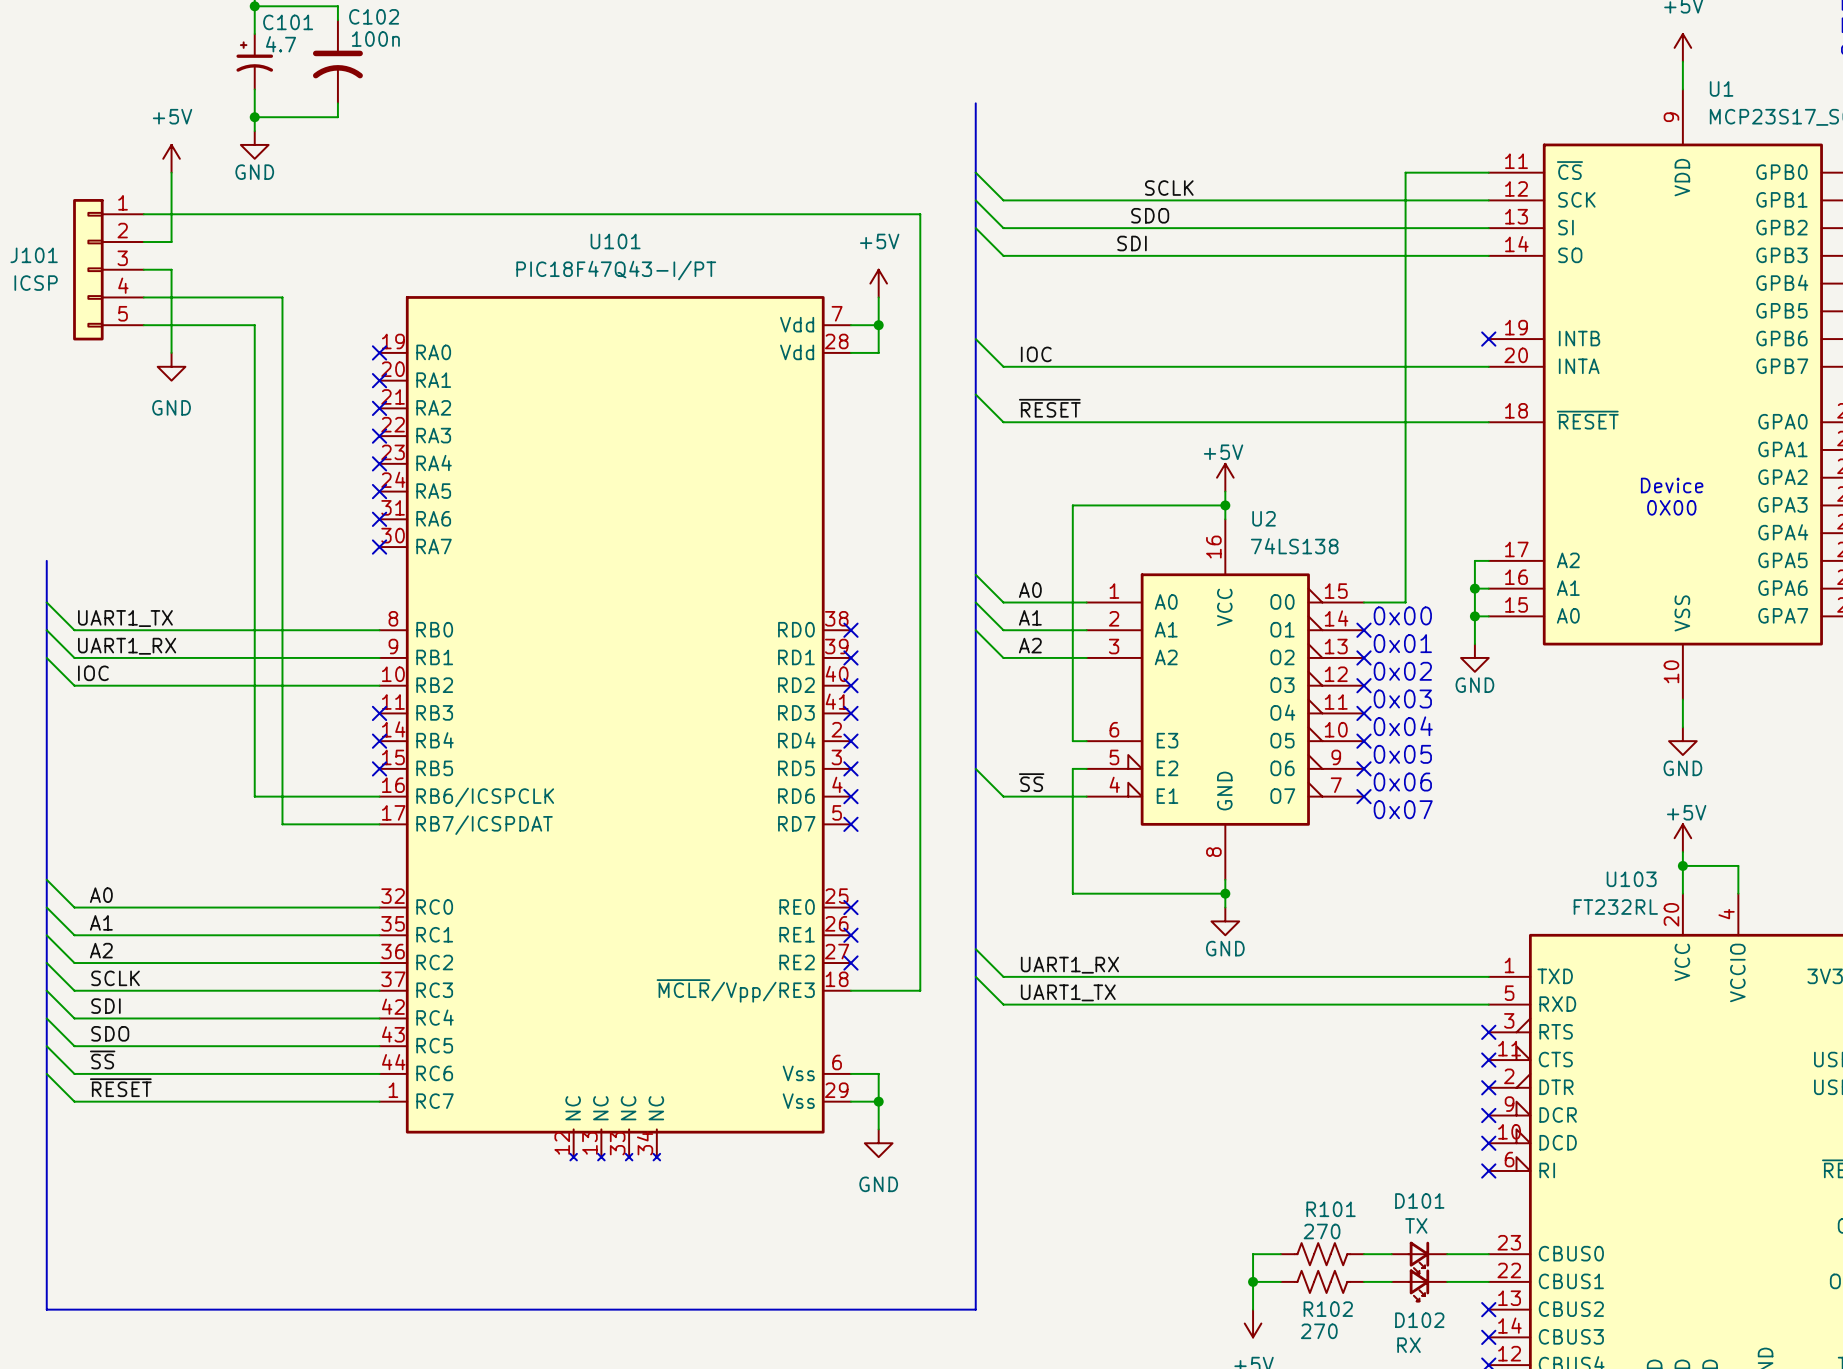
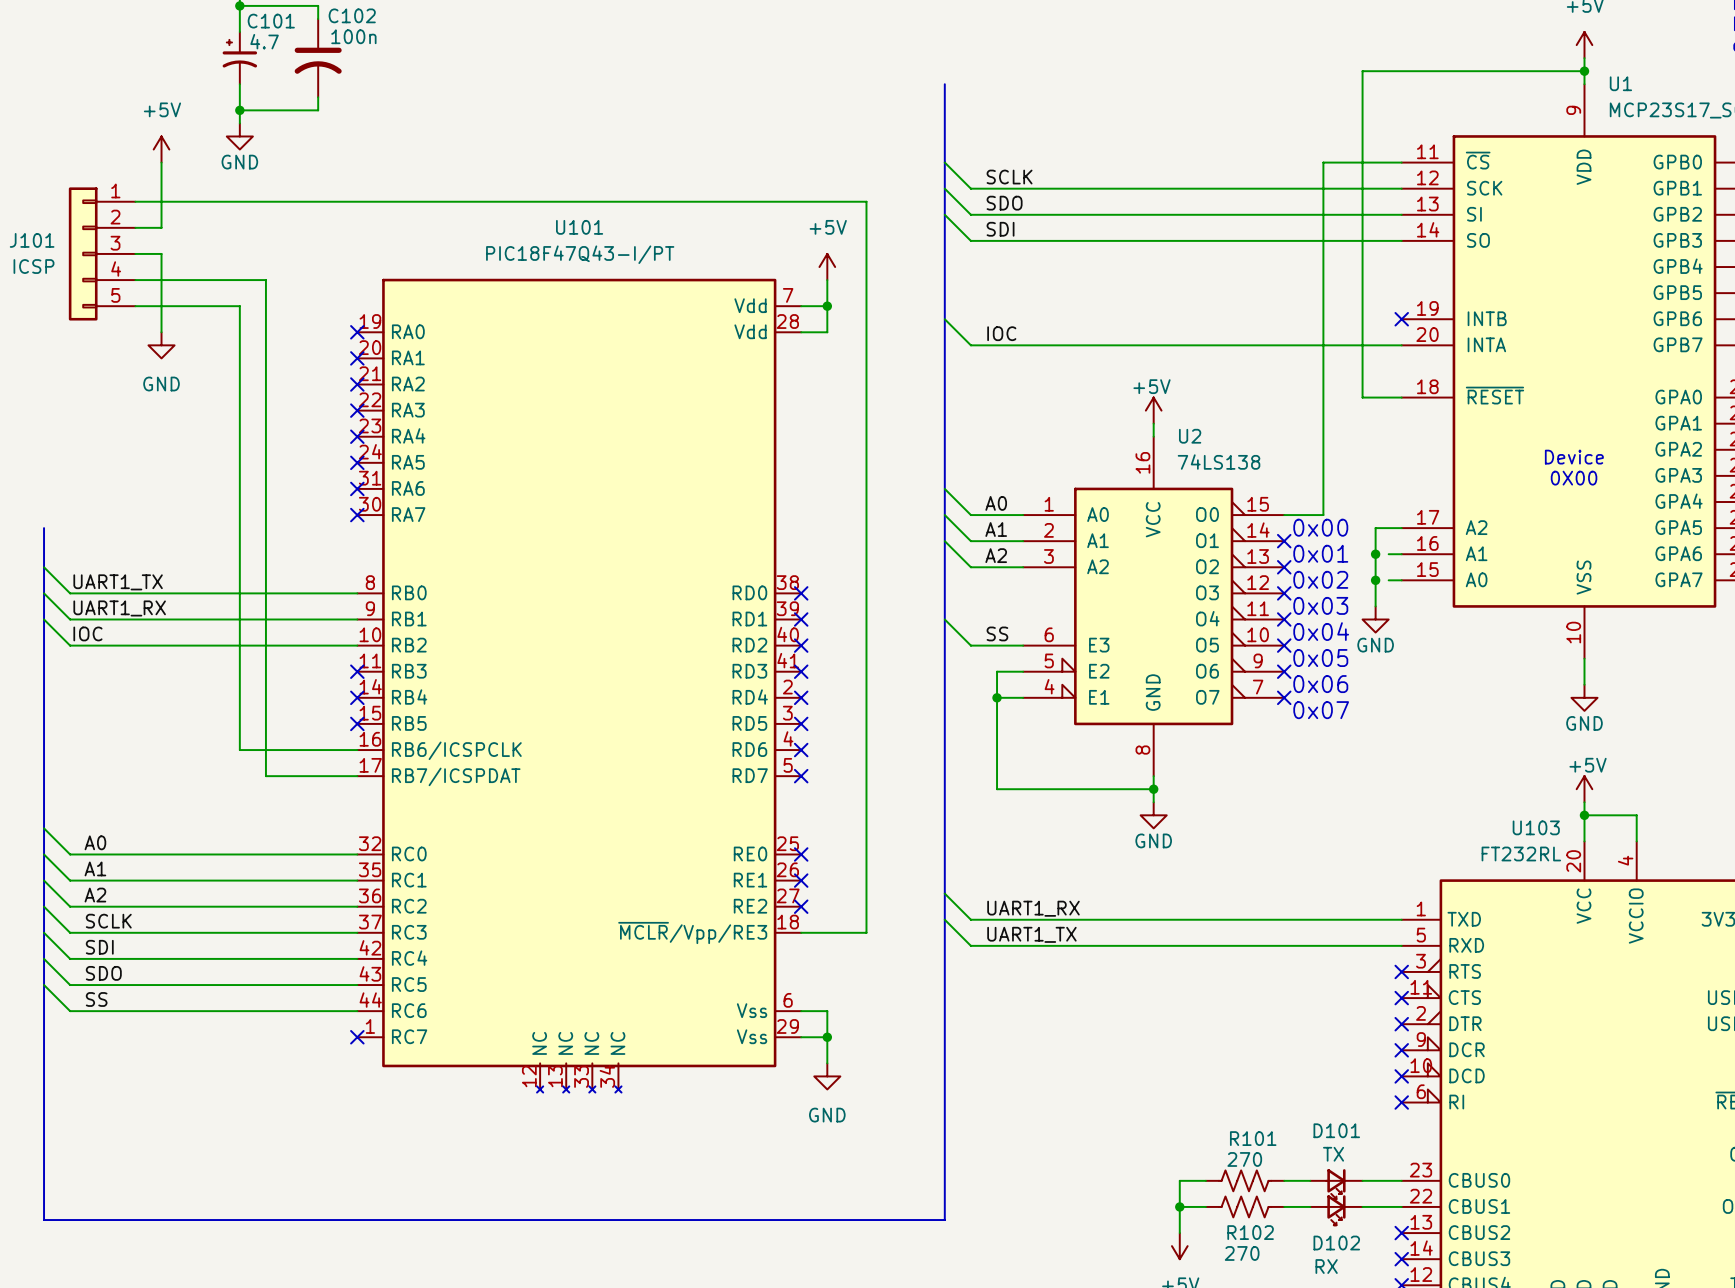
junction: none -> (1584, 71)
bus: (975, 103) (975, 1309) (46, 1309) (46, 1295) -> (944, 84) (944, 1220) (44, 1220)
wire: (975, 172) (1003, 200) (1031, 200) -> (944, 162) (970, 188)
label position: SCLK (1169, 188) -> SCLK (1009, 177)
wire: (975, 200) (1003, 228) (1031, 228) -> (944, 188) (970, 214)
label position: SDO (1150, 215) -> SDO (1004, 203)
wire: (975, 228) (1003, 255) (1031, 255) -> (944, 214) (970, 240)
label position: SDI (1132, 243) -> SDI (1000, 229)
wire: (975, 339) (1003, 366) (1031, 366) -> (944, 319) (970, 345)
label position: IOC (1036, 354) -> IOC (1001, 333)
wire: (975, 394) (1003, 422) (1447, 422) -> (1584, 71) (1362, 71) (1362, 397)
label: ~{RESET} (1049, 408) -> none
wire: none -> (1153, 423) (1153, 436)
power symbol position: +5V (1225, 477) -> +5V (1153, 410)
wire: (1225, 505) (1072, 505) (1072, 741) -> (997, 697) (1010, 697)
junction: (1225, 505) -> none
wire: none -> (944, 488) (970, 515) (1023, 515)
wire: none -> (944, 515) (970, 541) (1023, 541)
wire: (1405, 547) (1405, 602) (1363, 602) -> (1323, 515) (1284, 515)
text: none -> 0x00 (1320, 527)
wire: (1474, 560) (1474, 644) -> (1388, 528) (1375, 528) (1375, 606)
wire: (975, 574) (1003, 602) (1031, 602) -> (944, 541) (970, 567)
no-connect mark: none -> (1284, 541)
text: none -> 0x01 (1320, 553)
junction position: (1474, 588) -> (1375, 554)
label position: A0 (1030, 590) -> A0 (996, 503)
wire: (975, 602) (1003, 630) (1086, 630) -> none
no-connect mark: none -> (1284, 567)
text: 0x00 (1402, 615) -> 0x02 (1320, 579)
junction position: (1474, 616) -> (1375, 580)
label position: A1 (1030, 617) -> A1 (996, 529)
wire: (975, 630) (1003, 657) (1086, 657) -> none
text: 0x01 (1402, 643) -> 0x03 (1320, 605)
label position: A2 (1030, 645) -> A2 (996, 555)
wire: none -> (944, 619) (970, 645) (1023, 645)
power symbol position: GND (1474, 657) -> GND (1375, 619)
text: 0x02 (1402, 671) -> 0x04 (1321, 631)
label: none -> SS (997, 633)
text: 0x03 (1402, 698) -> 0x05 (1320, 658)
U2 position: (1225, 699) -> (1153, 606)
wire: none -> (1023, 671) (997, 671) (997, 789) (1153, 789)
text: 0x04 (1403, 726) -> 0x06 (1320, 684)
junction: none -> (997, 697)
text: 0x05 (1402, 754) -> 0x07 (1321, 710)
wire: (975, 768) (1003, 796) (1086, 796) -> none
wire: (1086, 768) (1072, 768) (1072, 893) (1225, 893) -> none
no-connect mark: (1363, 768) -> none
label: ~{SS} (1031, 782) -> none
text: 0x06 (1402, 782) -> none
no-connect mark: (1363, 796) -> none
text: 0x07 (1403, 809) -> none
junction position: (1225, 893) -> (1153, 789)
power symbol position: GND (1225, 921) -> GND (1153, 815)
wire: (975, 949) (1003, 976) (1031, 976) -> (944, 893) (970, 919)
label position: UART1_RX (1069, 965) -> UART1_RX (1033, 908)
wire: (975, 976) (1003, 1004) (1031, 1004) -> (944, 919) (970, 945)
label position: UART1_TX (1068, 992) -> UART1_TX (1031, 934)
label: ~{SS} (102, 1059) -> SS (96, 999)
wire: (46, 1073) (74, 1101) (379, 1101) -> none
label: ~{RESET} (120, 1087) -> none
no-connect mark: none -> (357, 1037)

